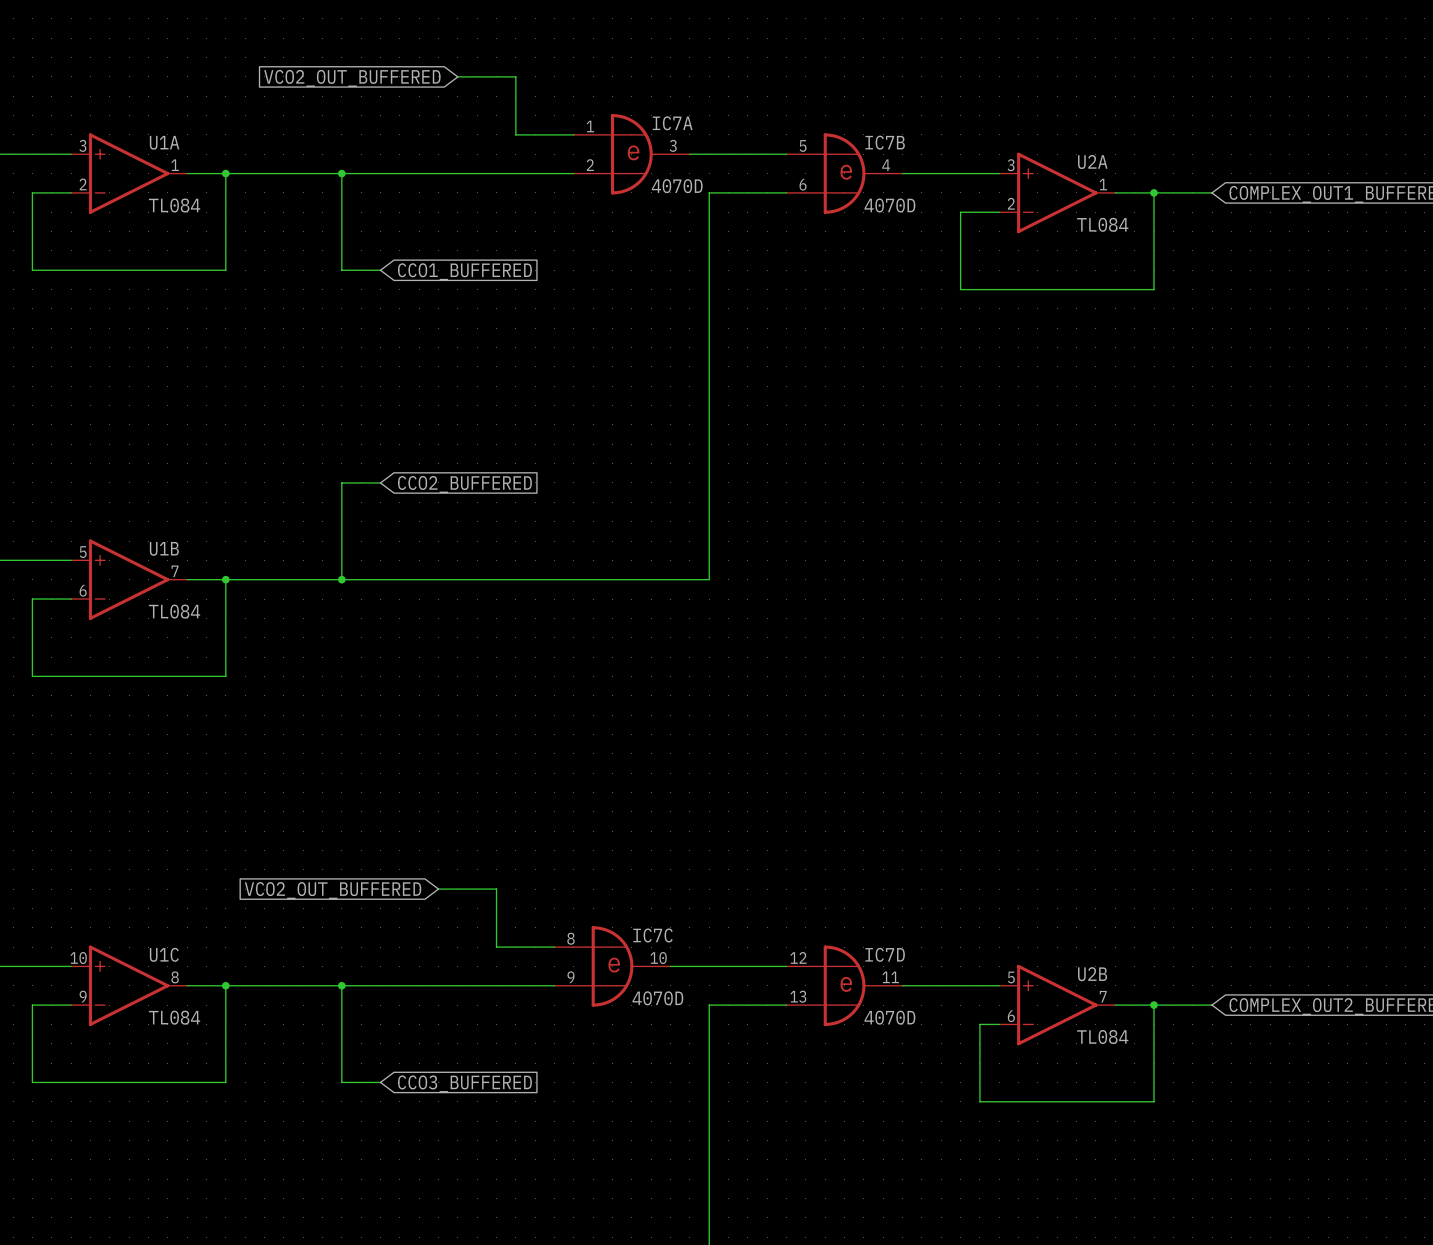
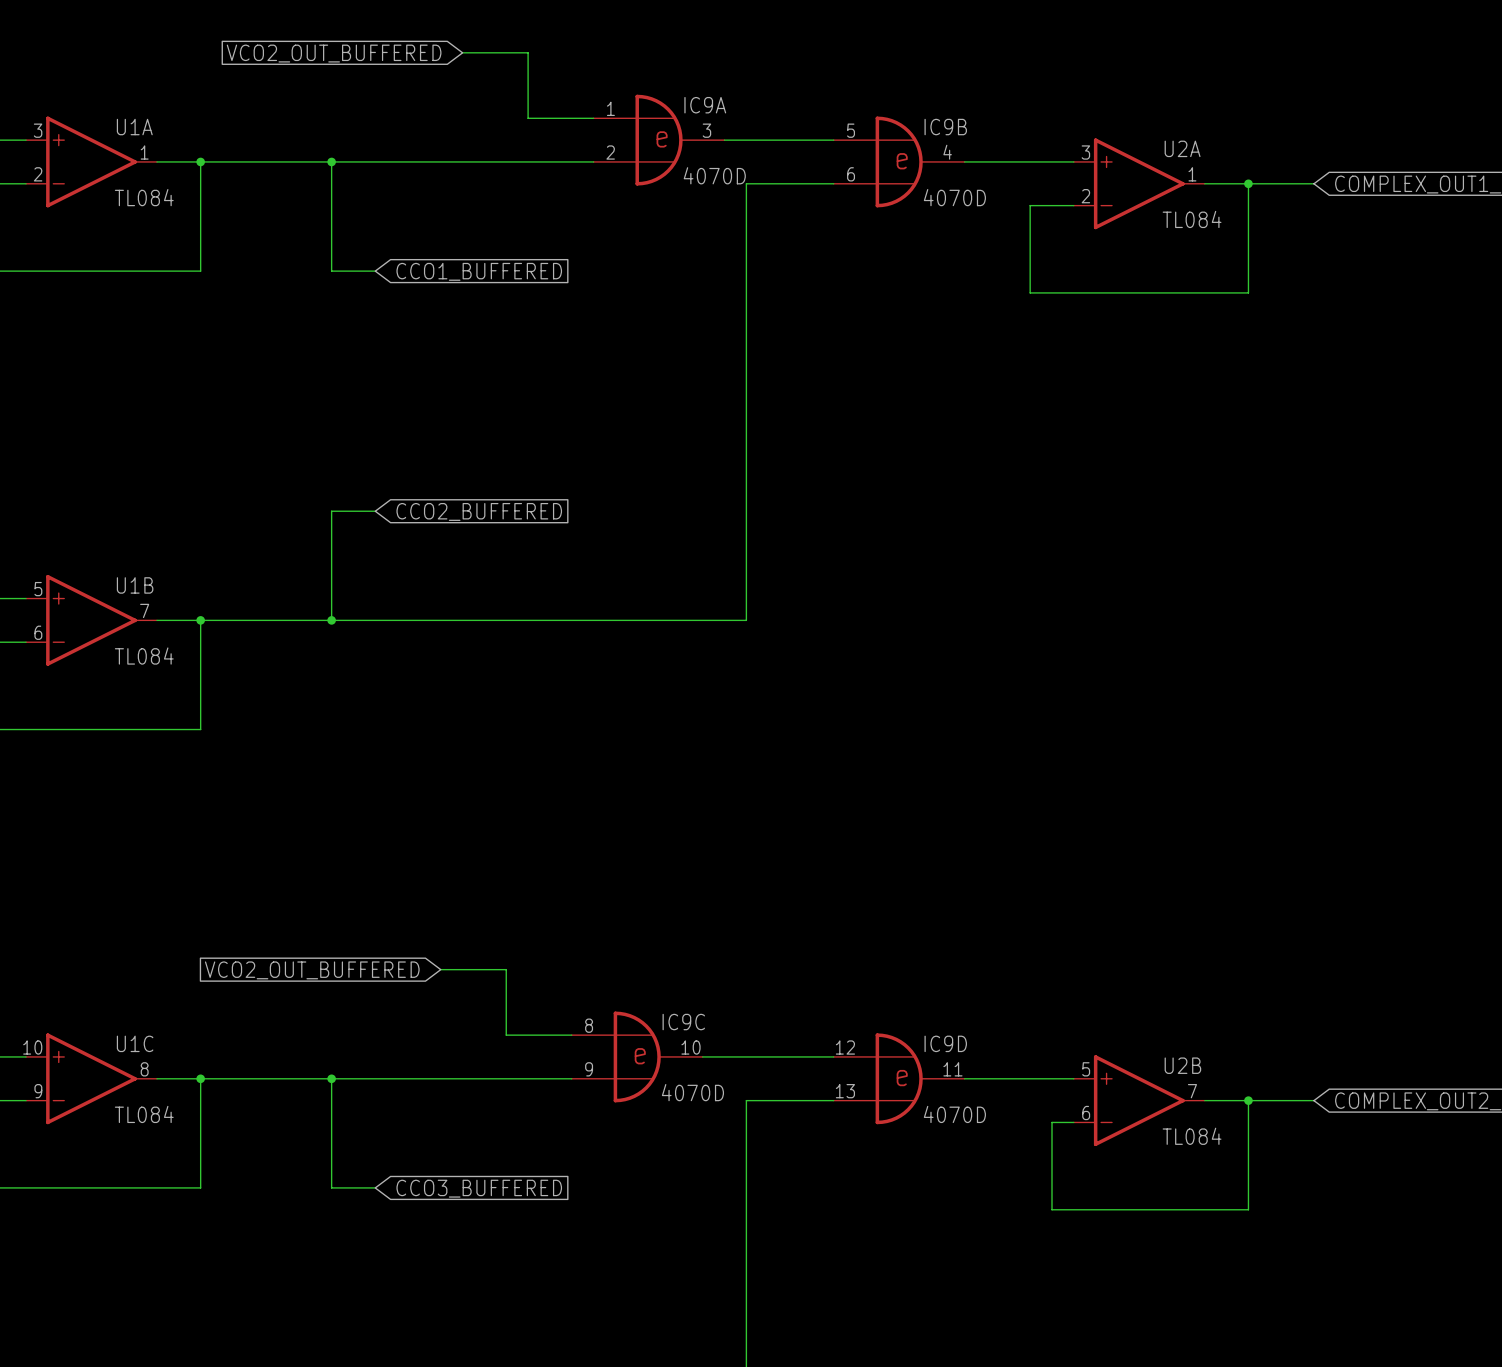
IC7A name: IC7A (672, 123) -> IC9A (705, 105)
IC7B name: IC7B (885, 142) -> IC9B (945, 127)
IC7C name: IC7C (653, 935) -> IC9C (683, 1022)
IC7D name: IC7D (885, 954) -> IC9D (945, 1043)

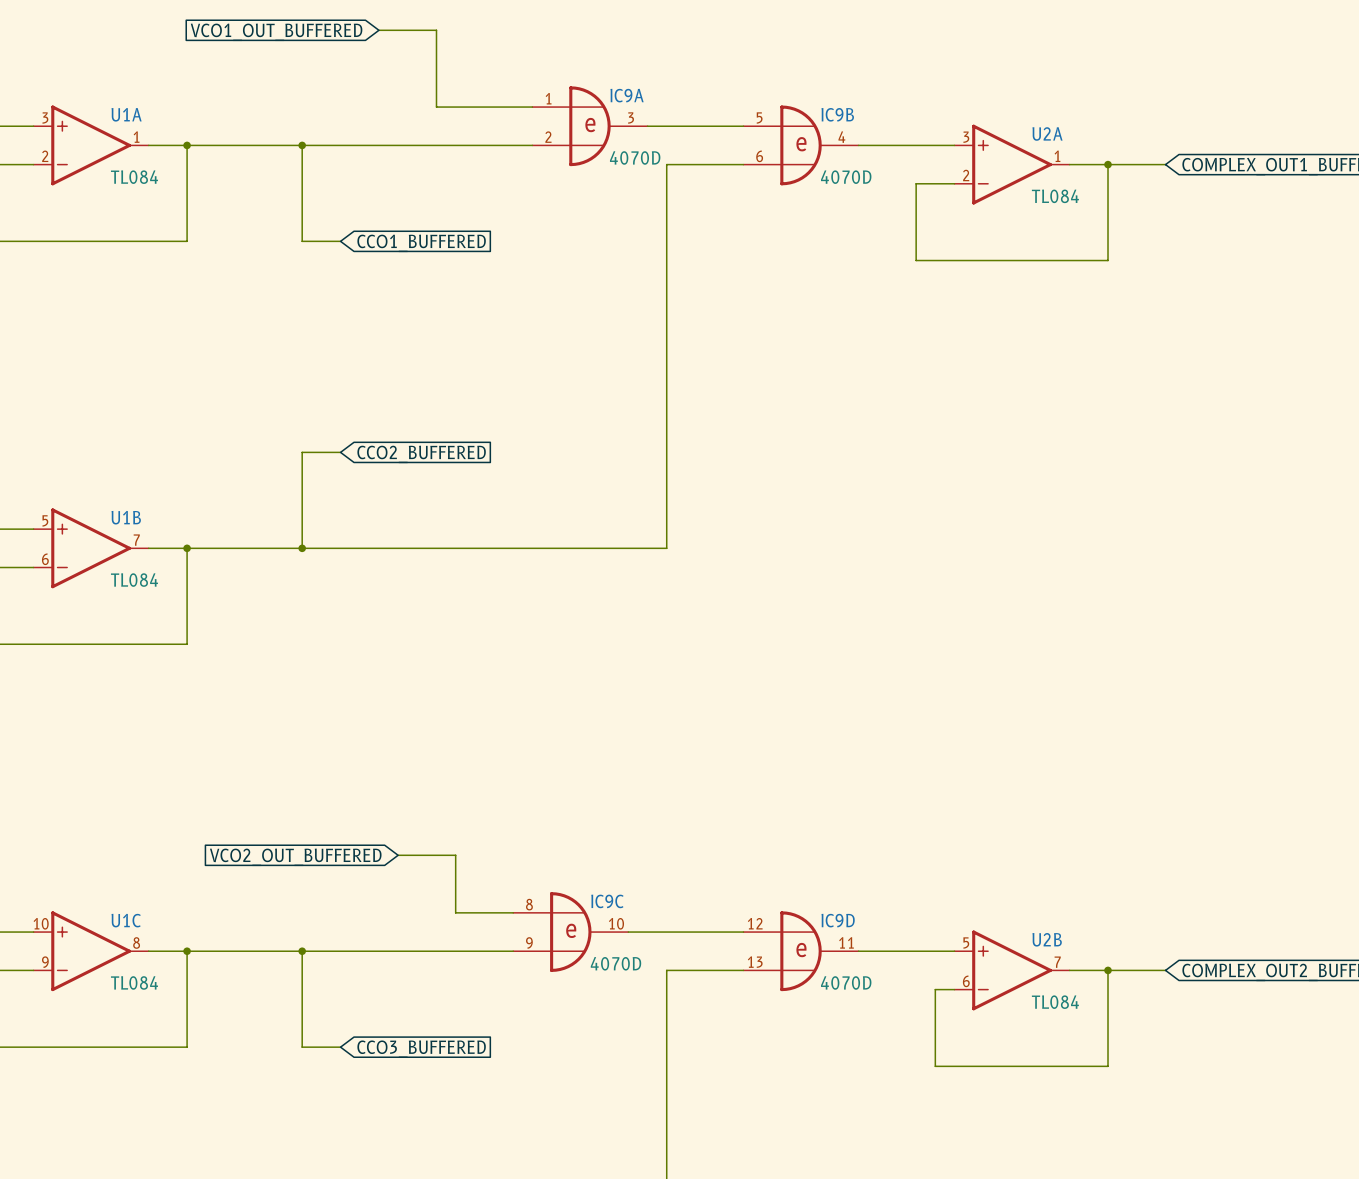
wire: (462, 52) (528, 52) (528, 118) -> (378, 30) (436, 30) (436, 107) (474, 107)
global label: VCO2_OUT_BUFFERED (334, 53) -> VCO1_OUT_BUFFERED (276, 32)

